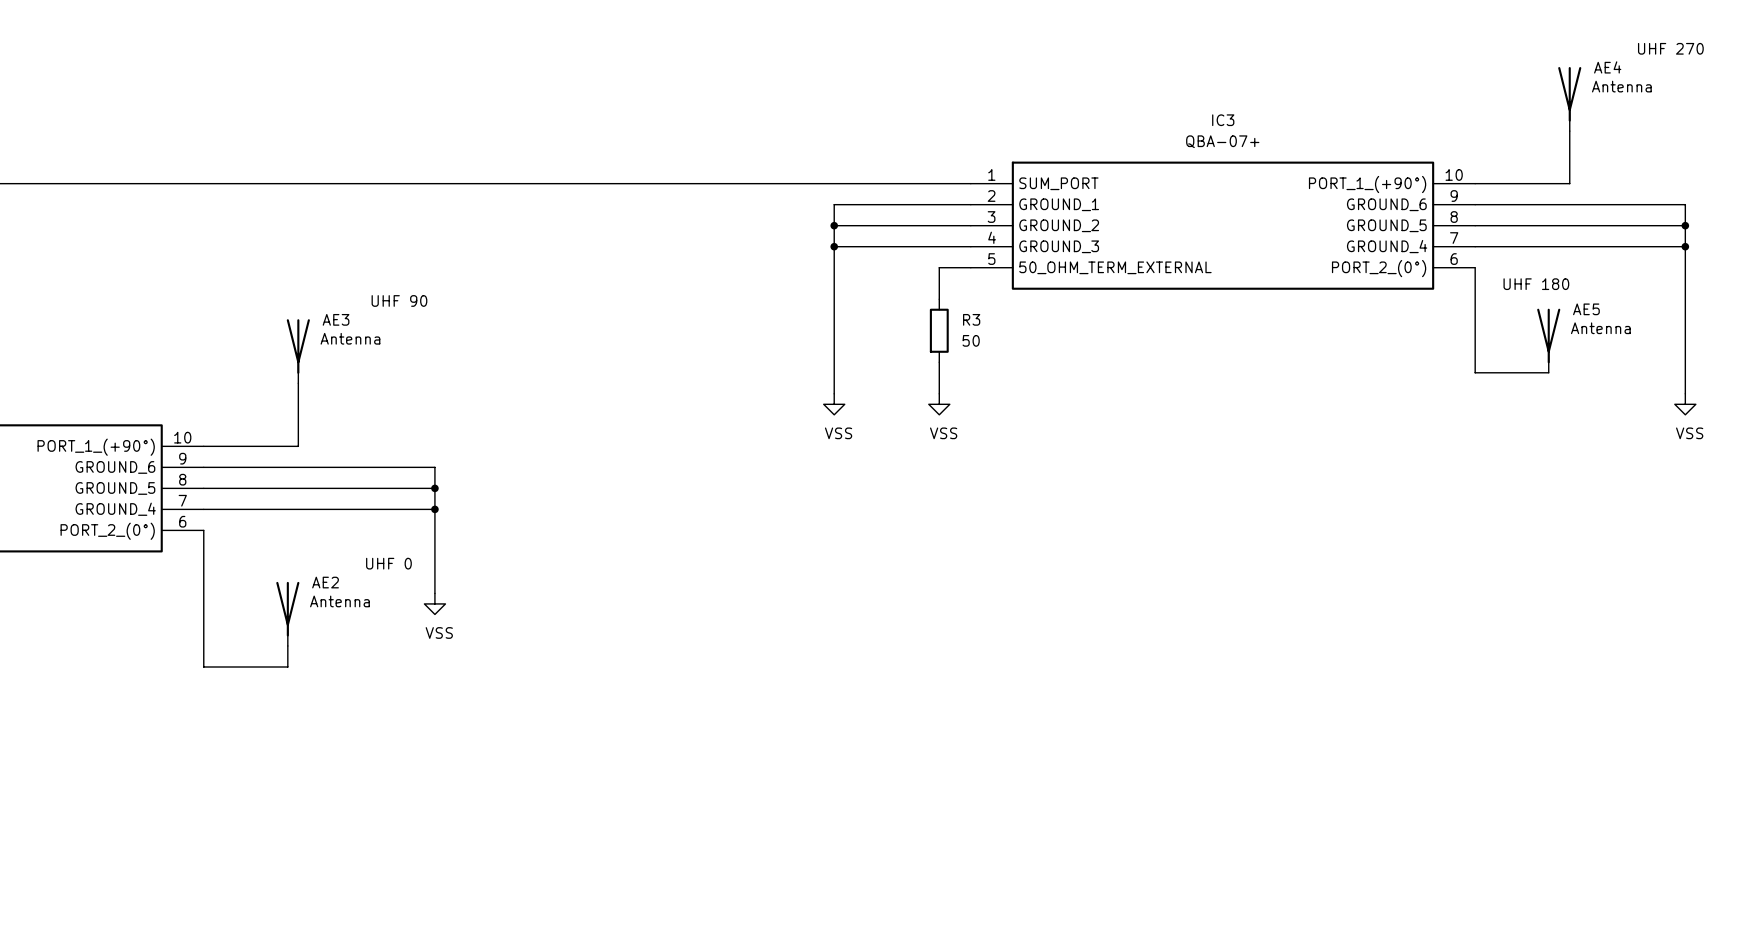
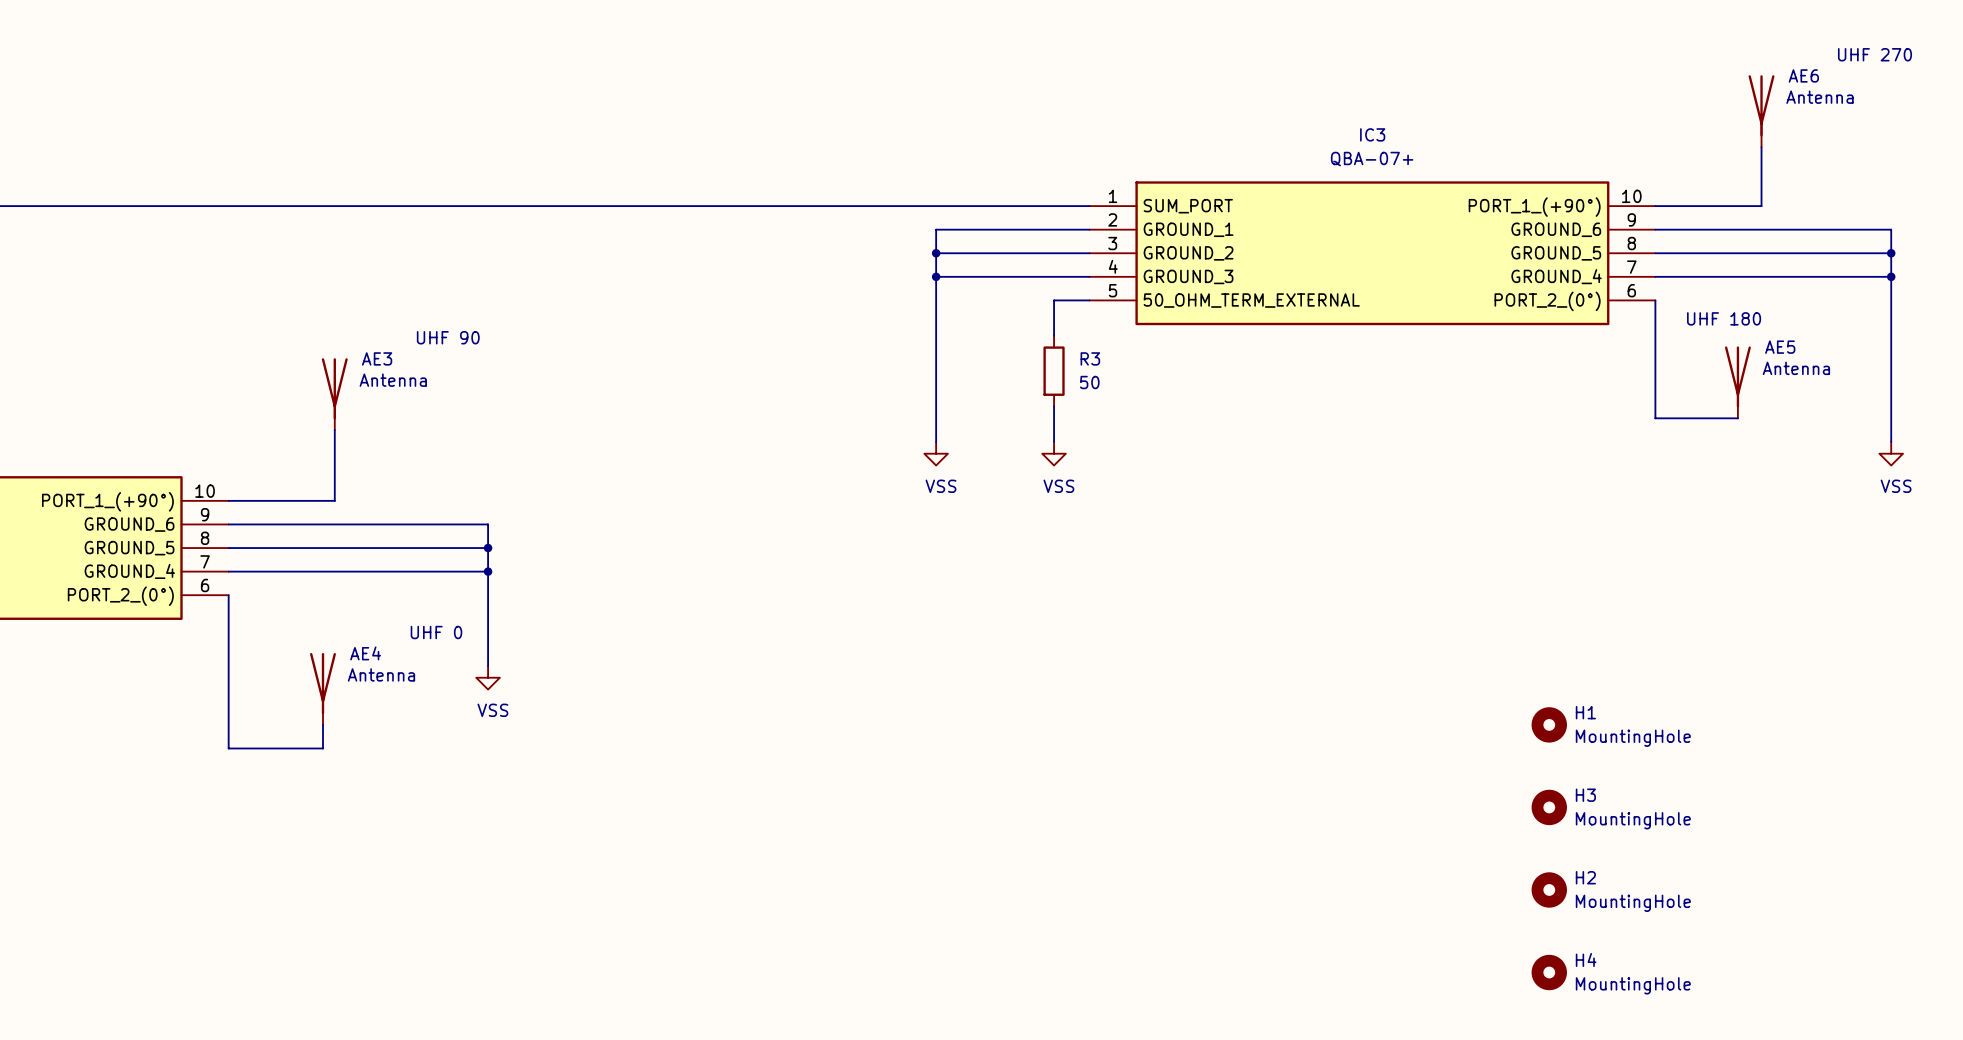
AE4 name: AE4 (1607, 67) -> AE6 (1803, 75)
AE2 name: AE2 (325, 582) -> AE4 (365, 653)
H1: none -> MountingHole (1549, 724)
H3: none -> MountingHole (1549, 807)
H2: none -> MountingHole (1549, 889)
H4: none -> MountingHole (1549, 972)

